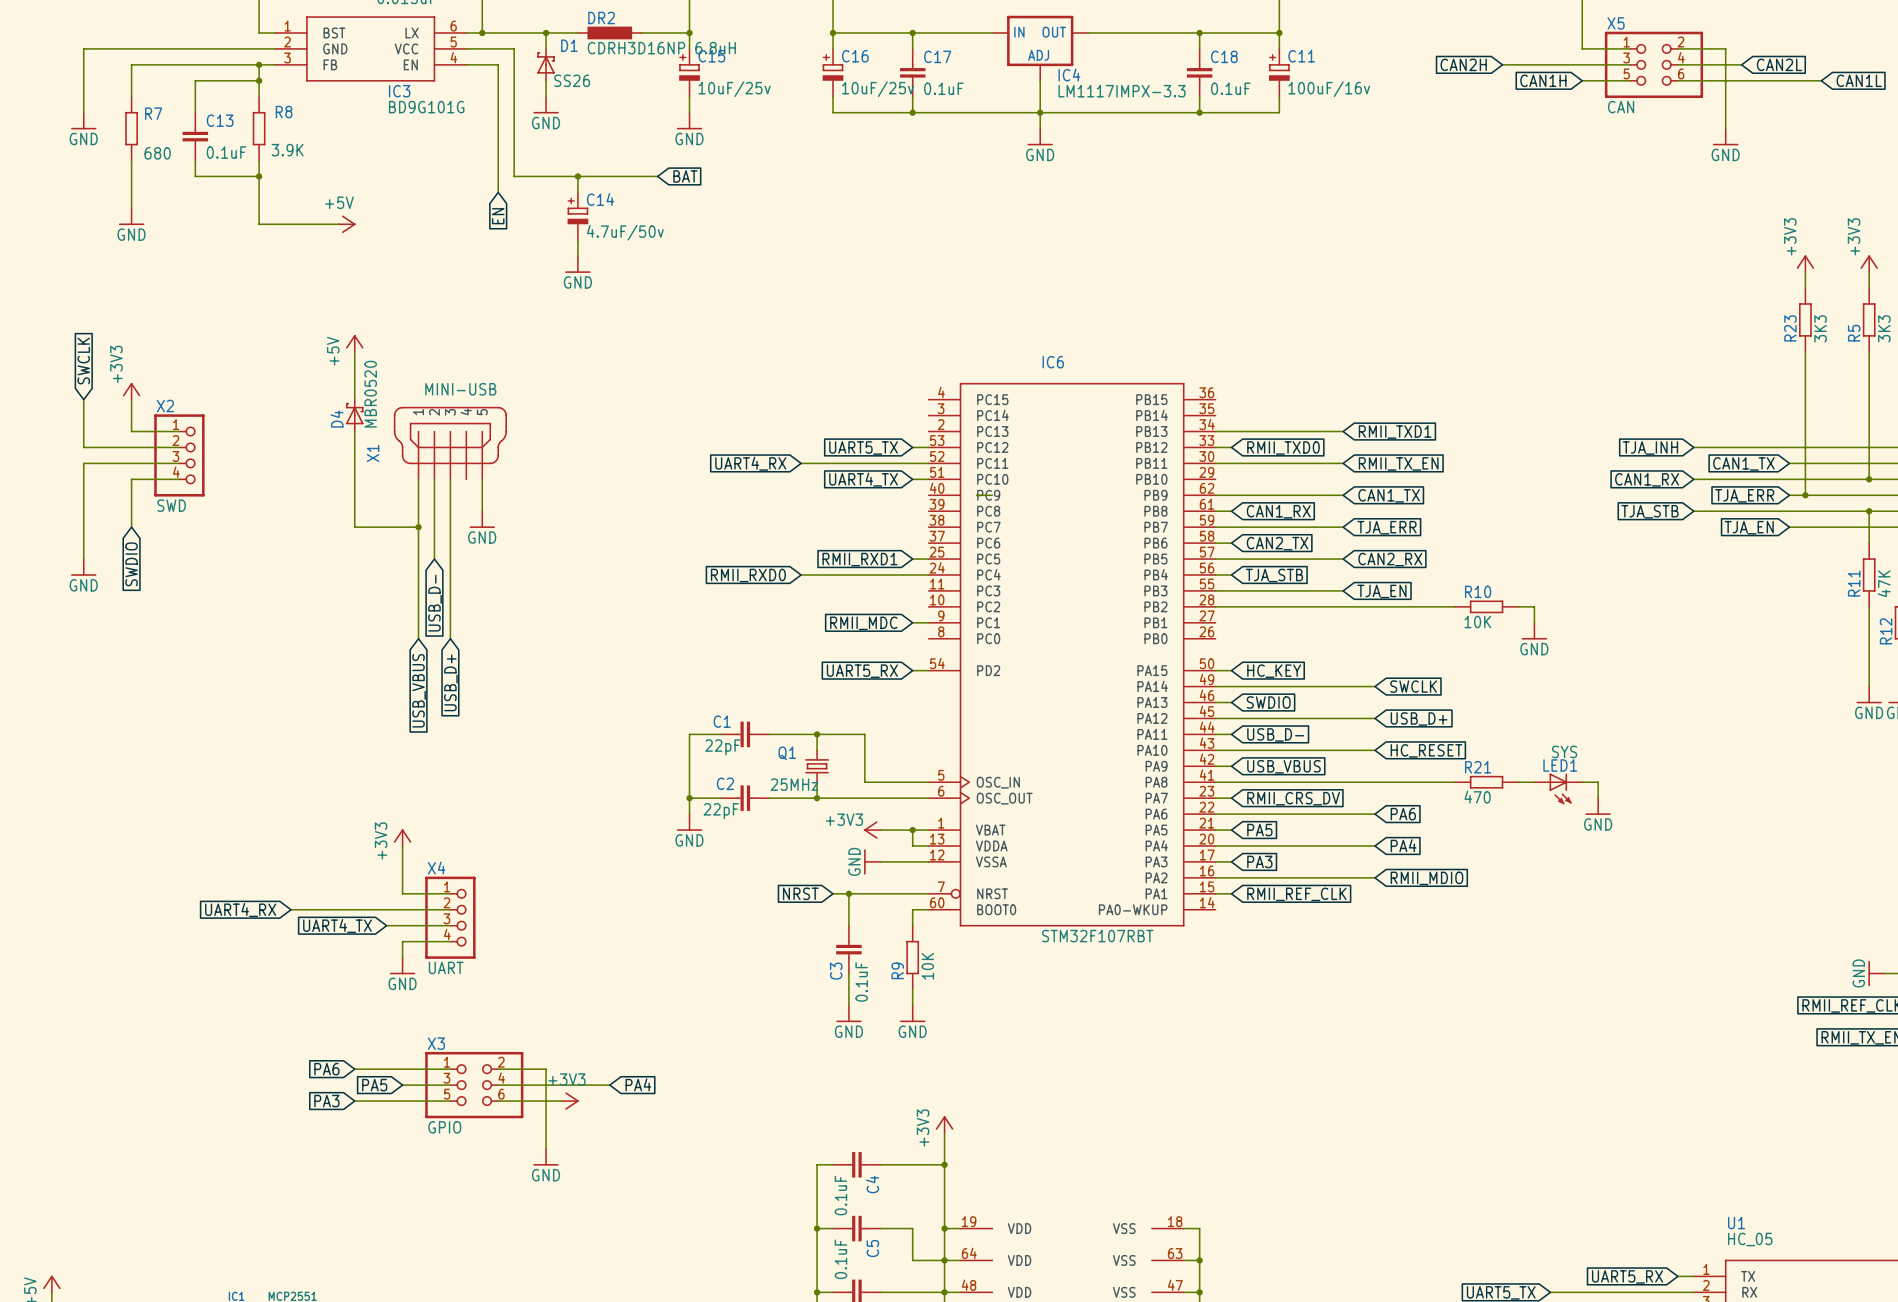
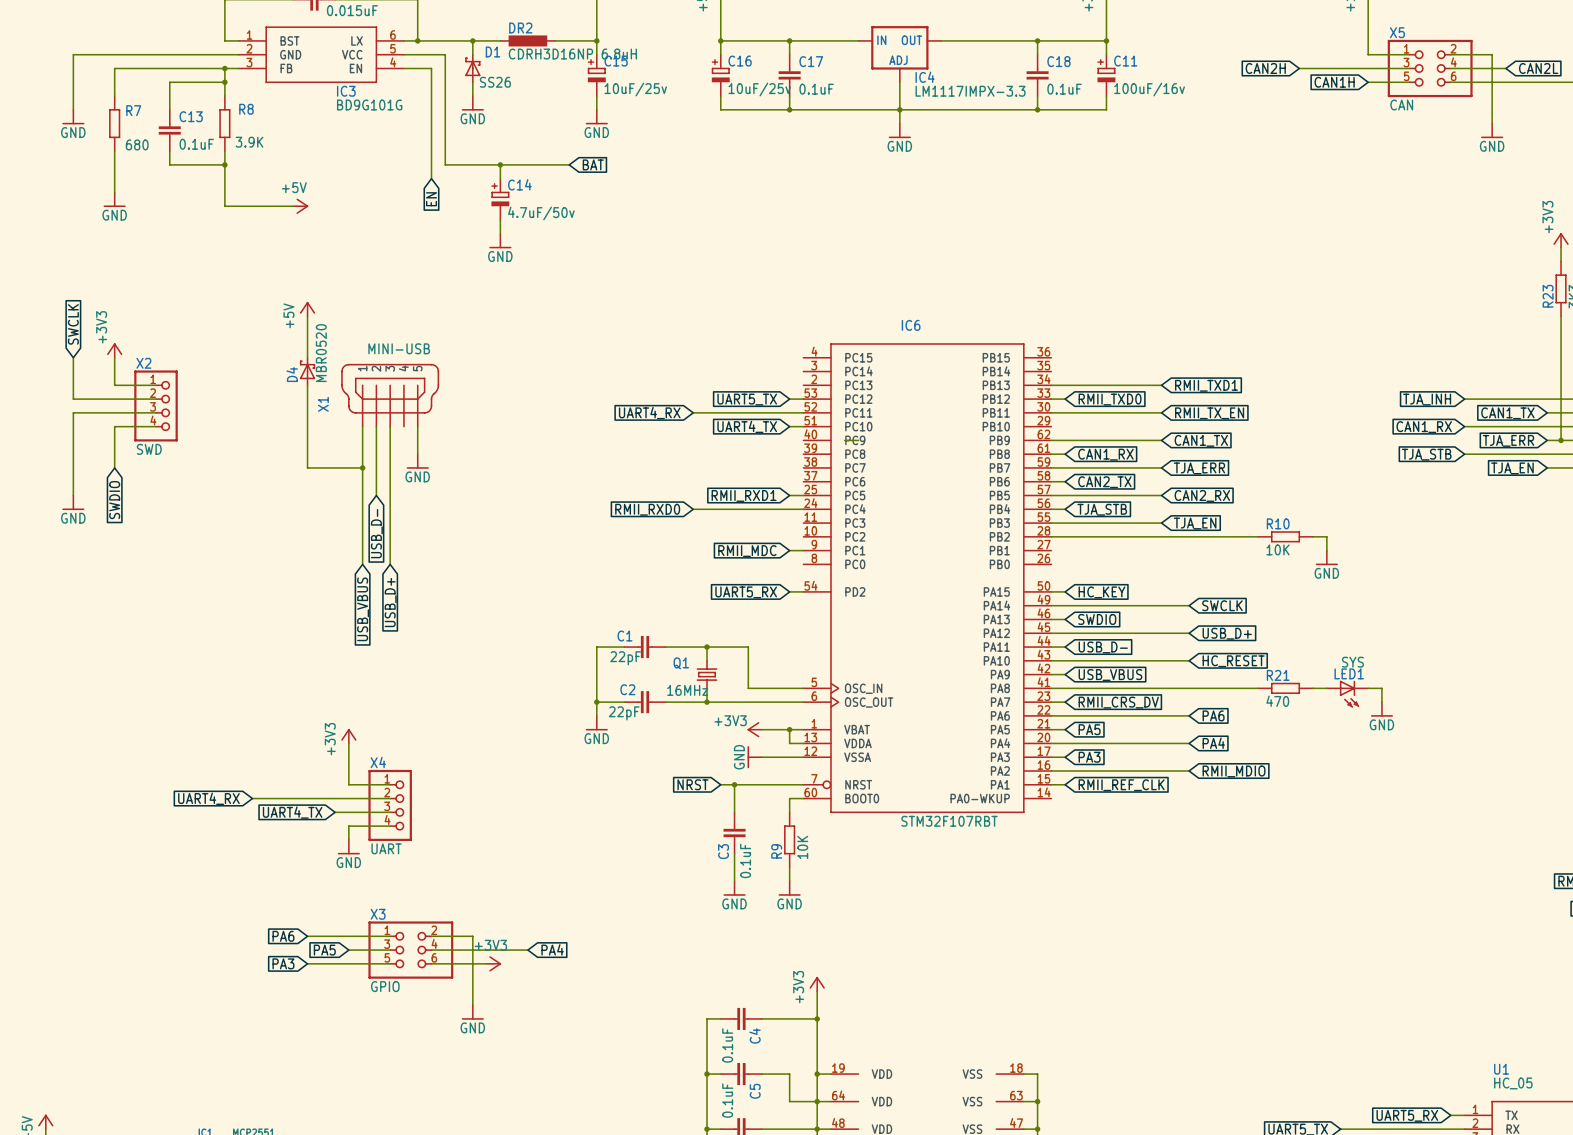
Q1 value: 25MHz (794, 784) -> 16MHz (687, 690)

